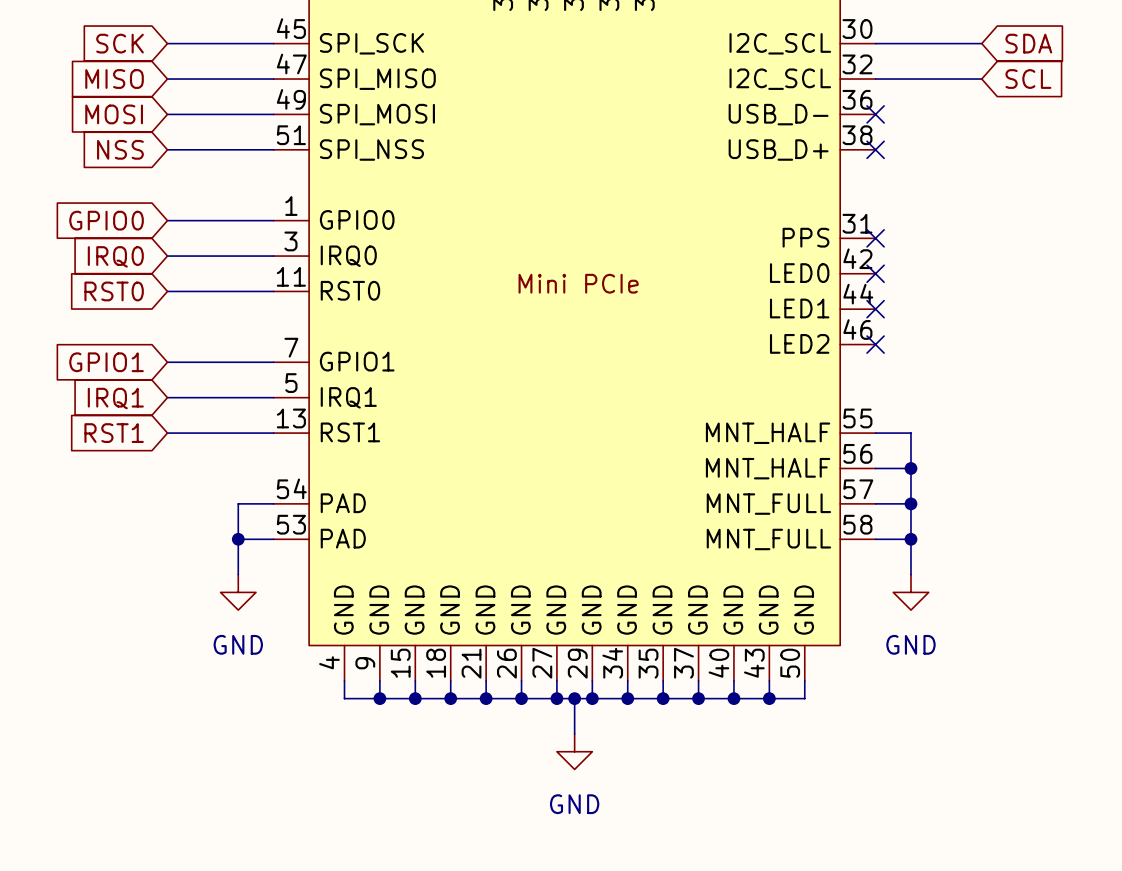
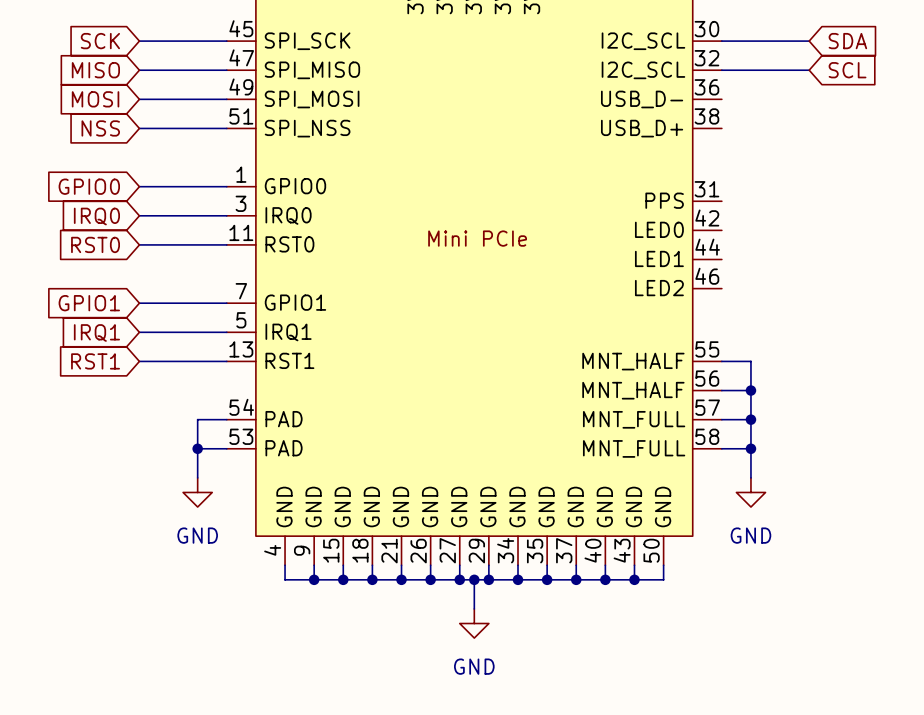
no-connect mark: (875, 114) -> none
no-connect mark: (875, 149) -> none
no-connect mark: (875, 238) -> none
no-connect mark: (875, 273) -> none
no-connect mark: (875, 309) -> none
no-connect mark: (875, 344) -> none

